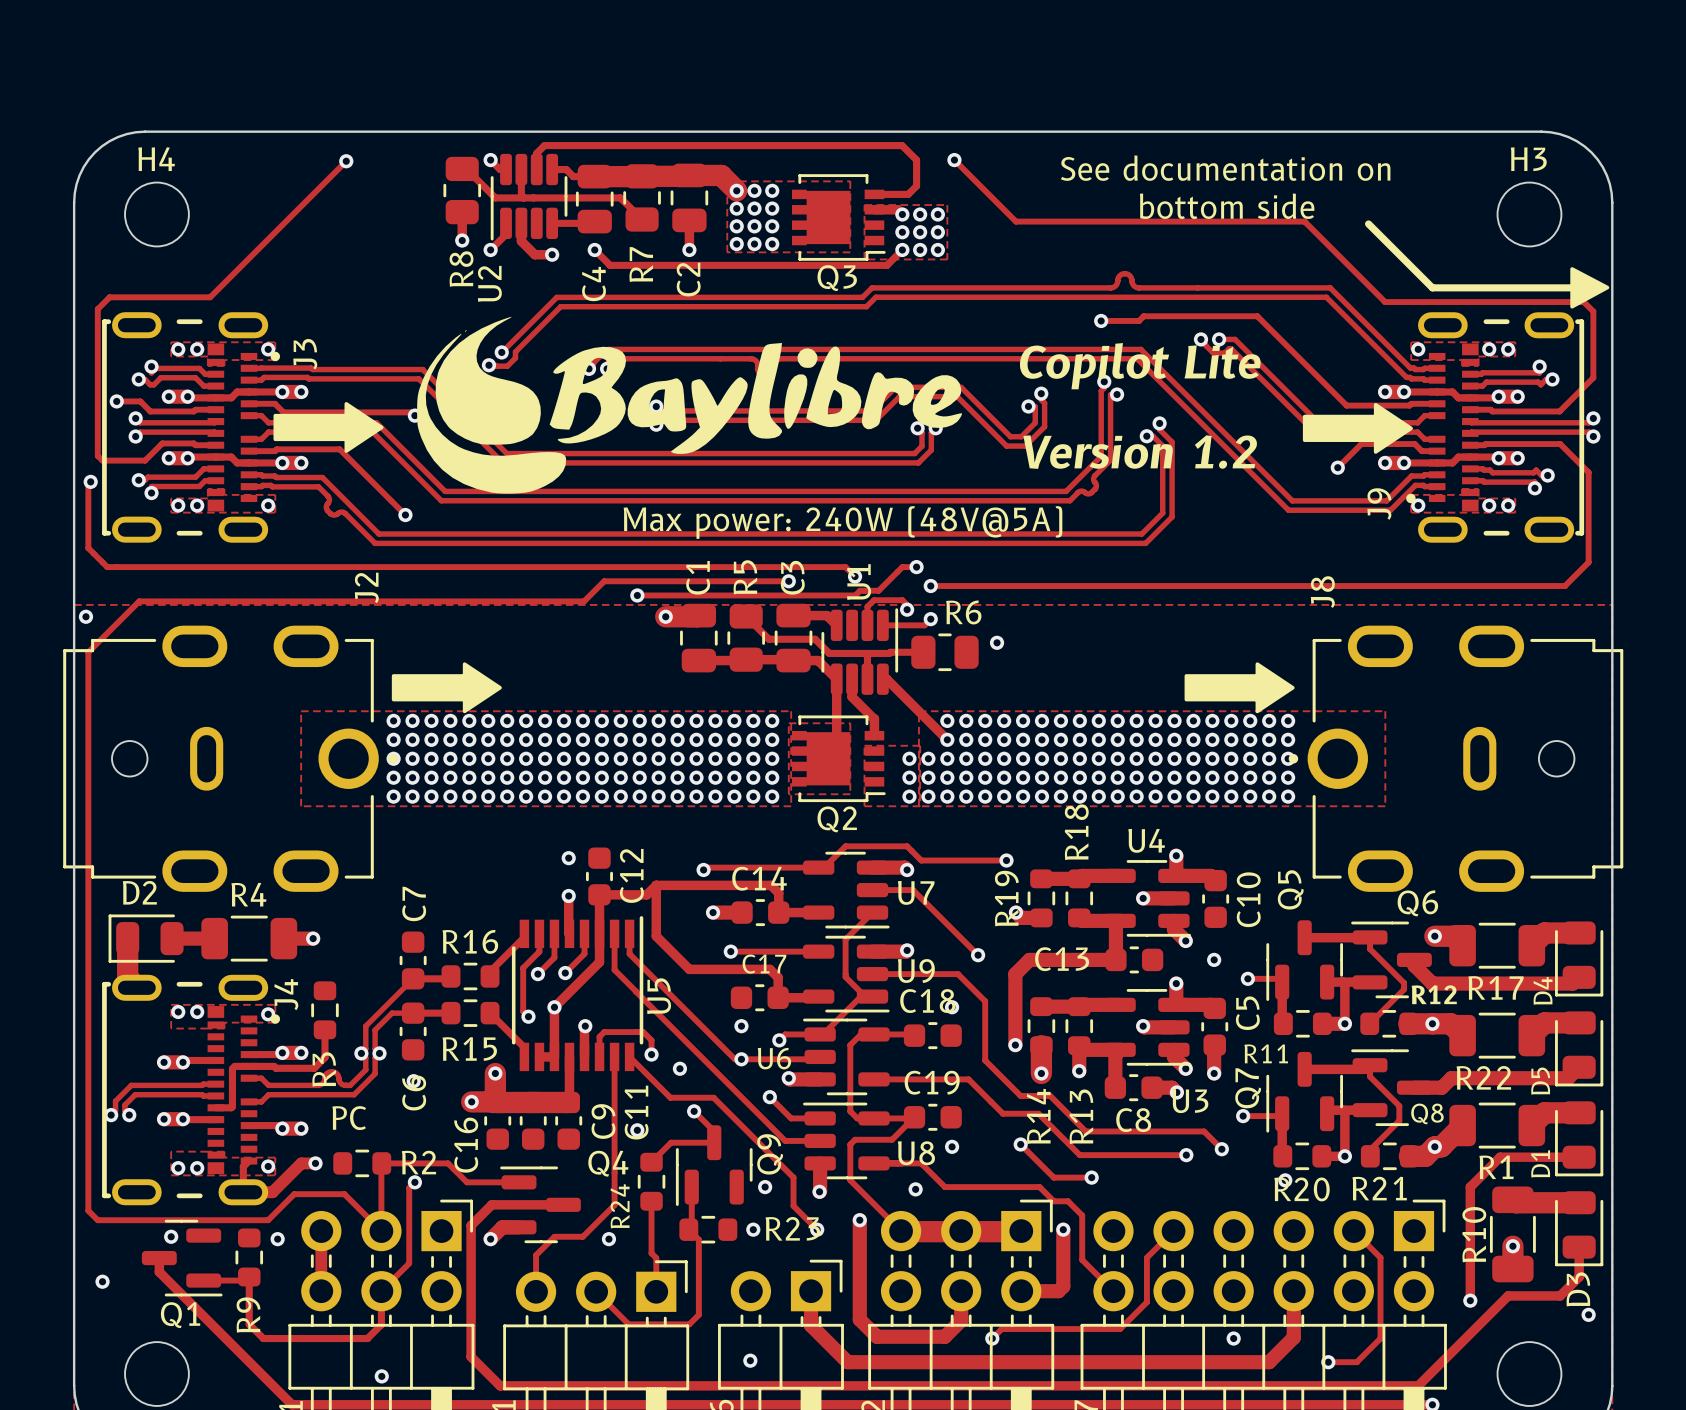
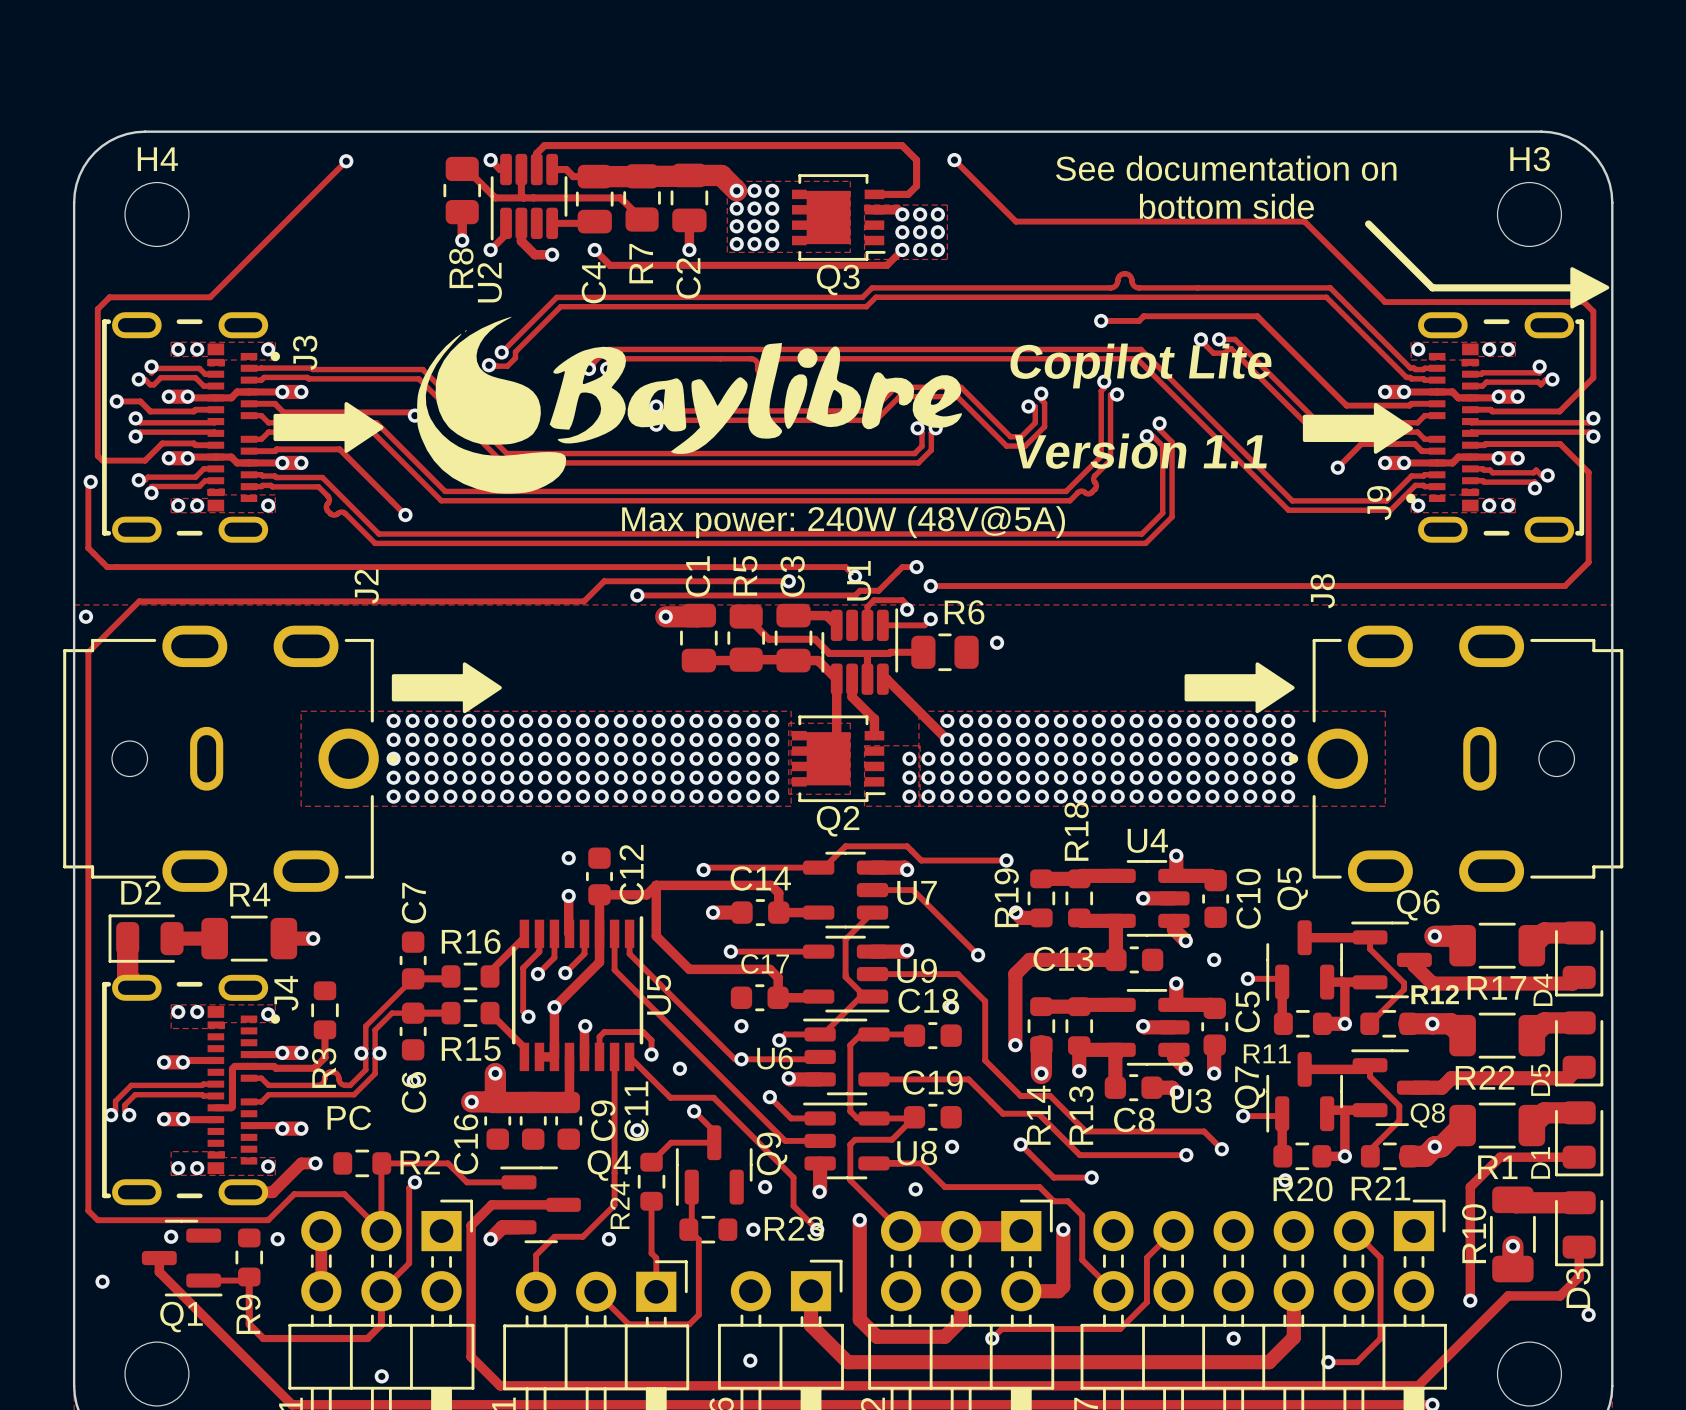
text: Version 1.2 (1140, 452) -> Version 1.1 (1140, 451)
track: (249, 1161) (243, 1166) (243, 1192) -> none

